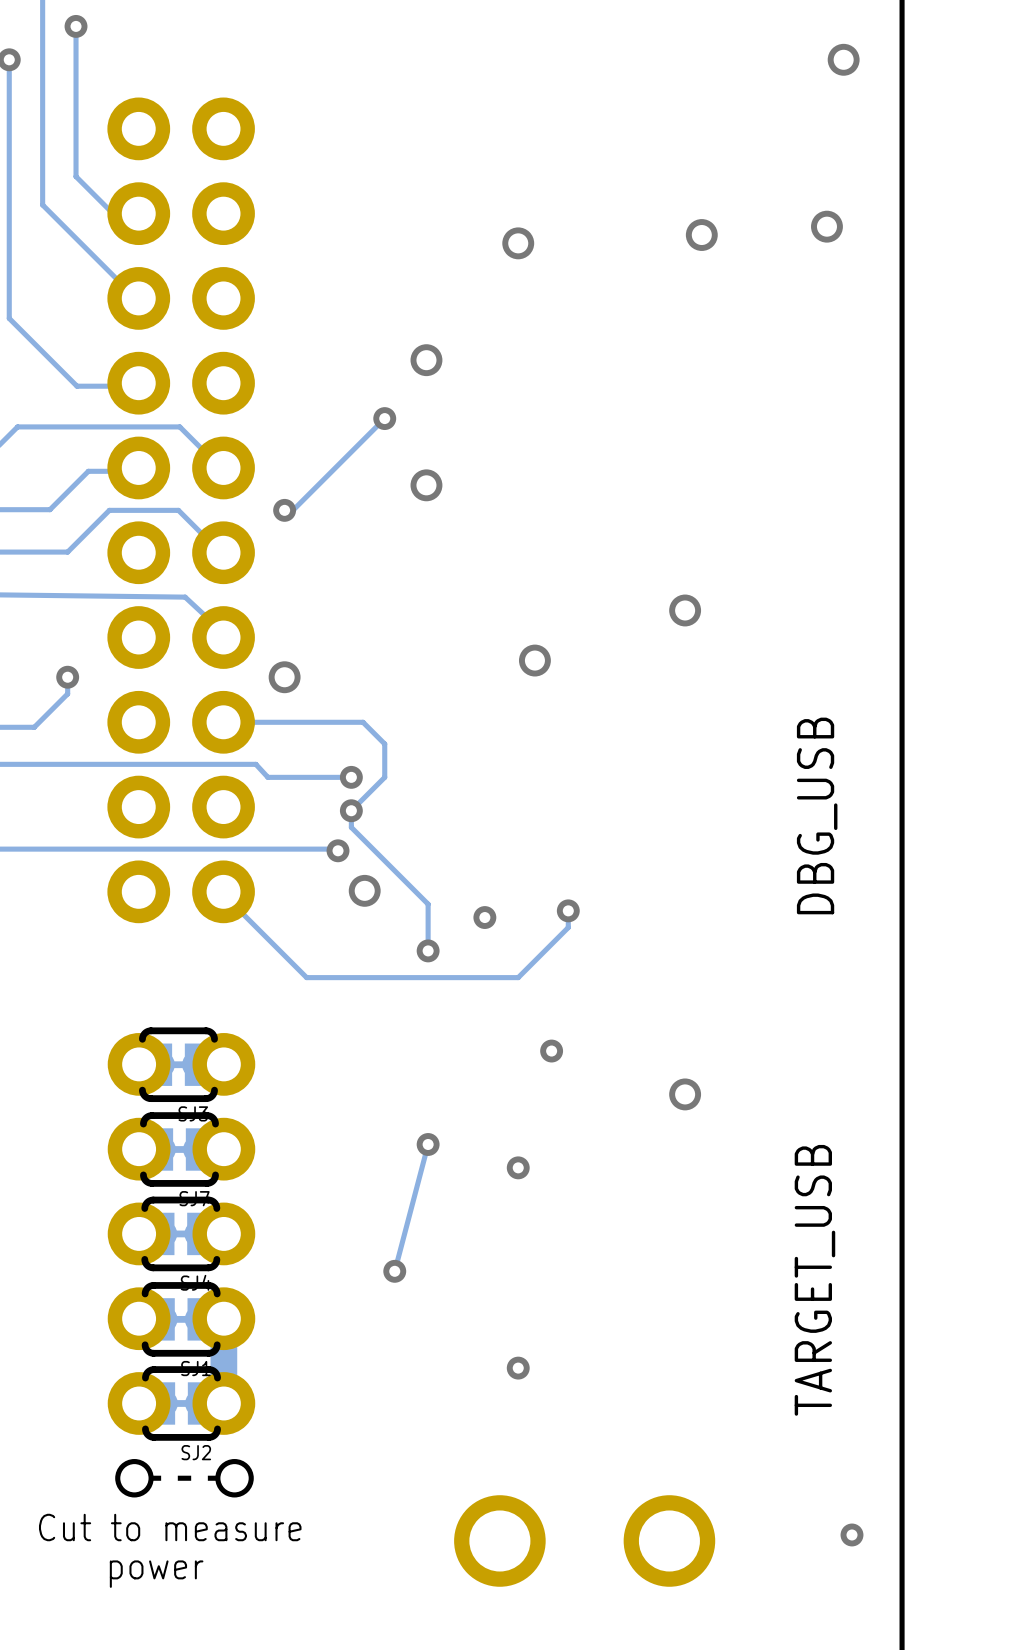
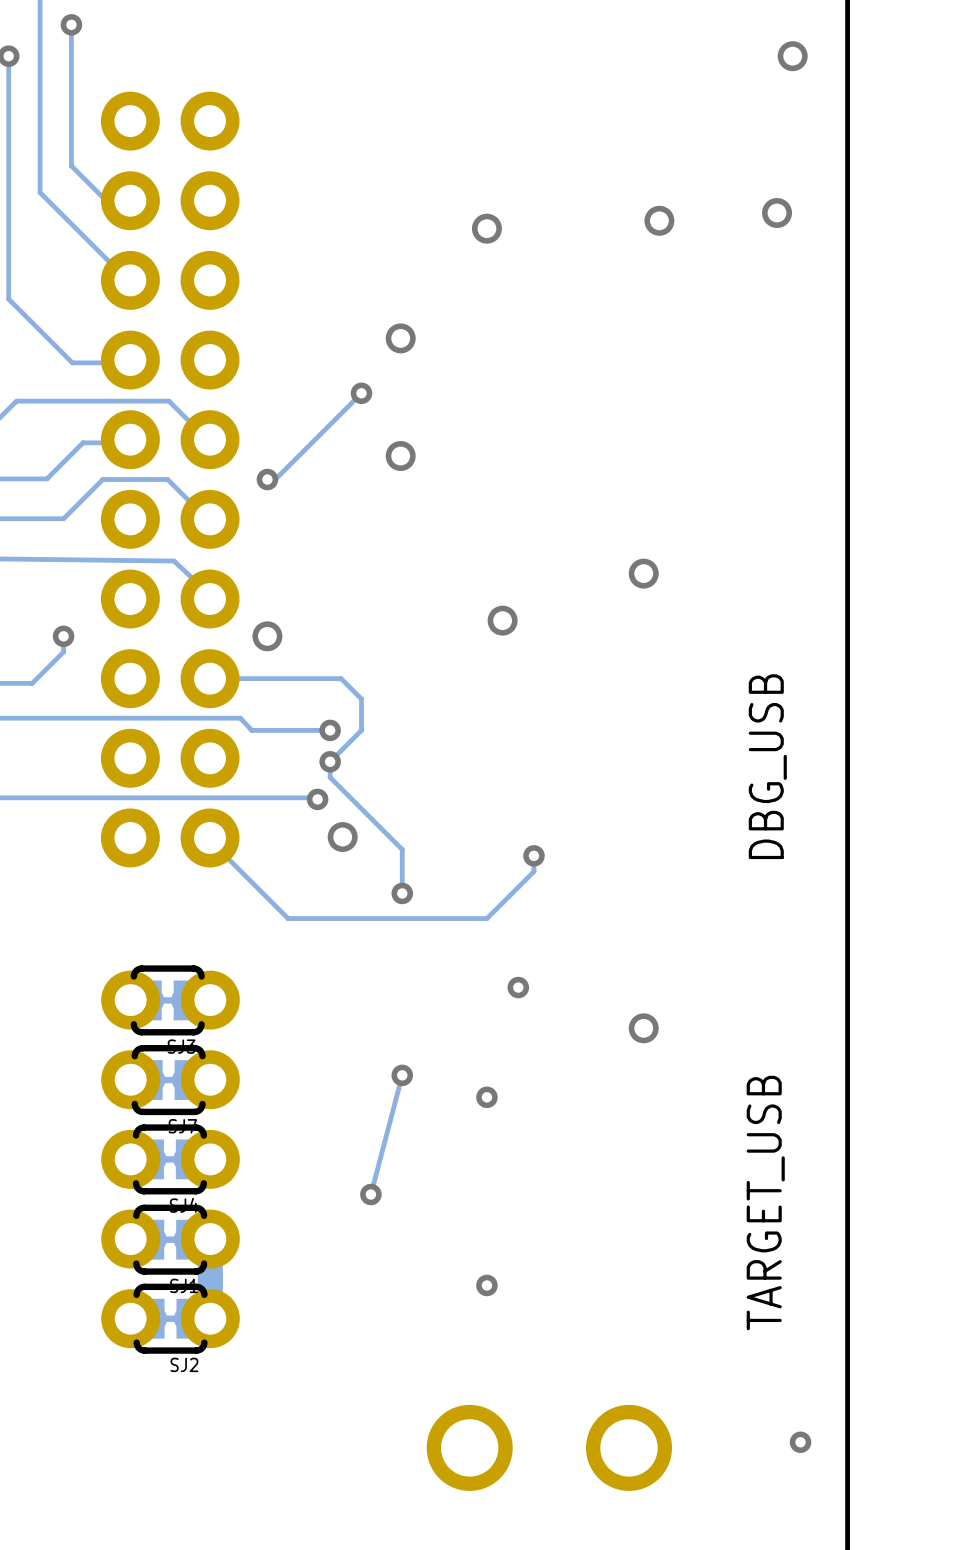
via: (484, 917) -> none
drawing: [115, 1459, 154, 1498] -> none
drawing: [215, 1459, 254, 1498] -> none
line: (161, 1478) (151, 1478) -> none
line: (191, 1478) (177, 1478) -> none
line: (217, 1478) (207, 1478) -> none
text: Cut to measure (170, 1527) -> none
text: power (156, 1574) -> none

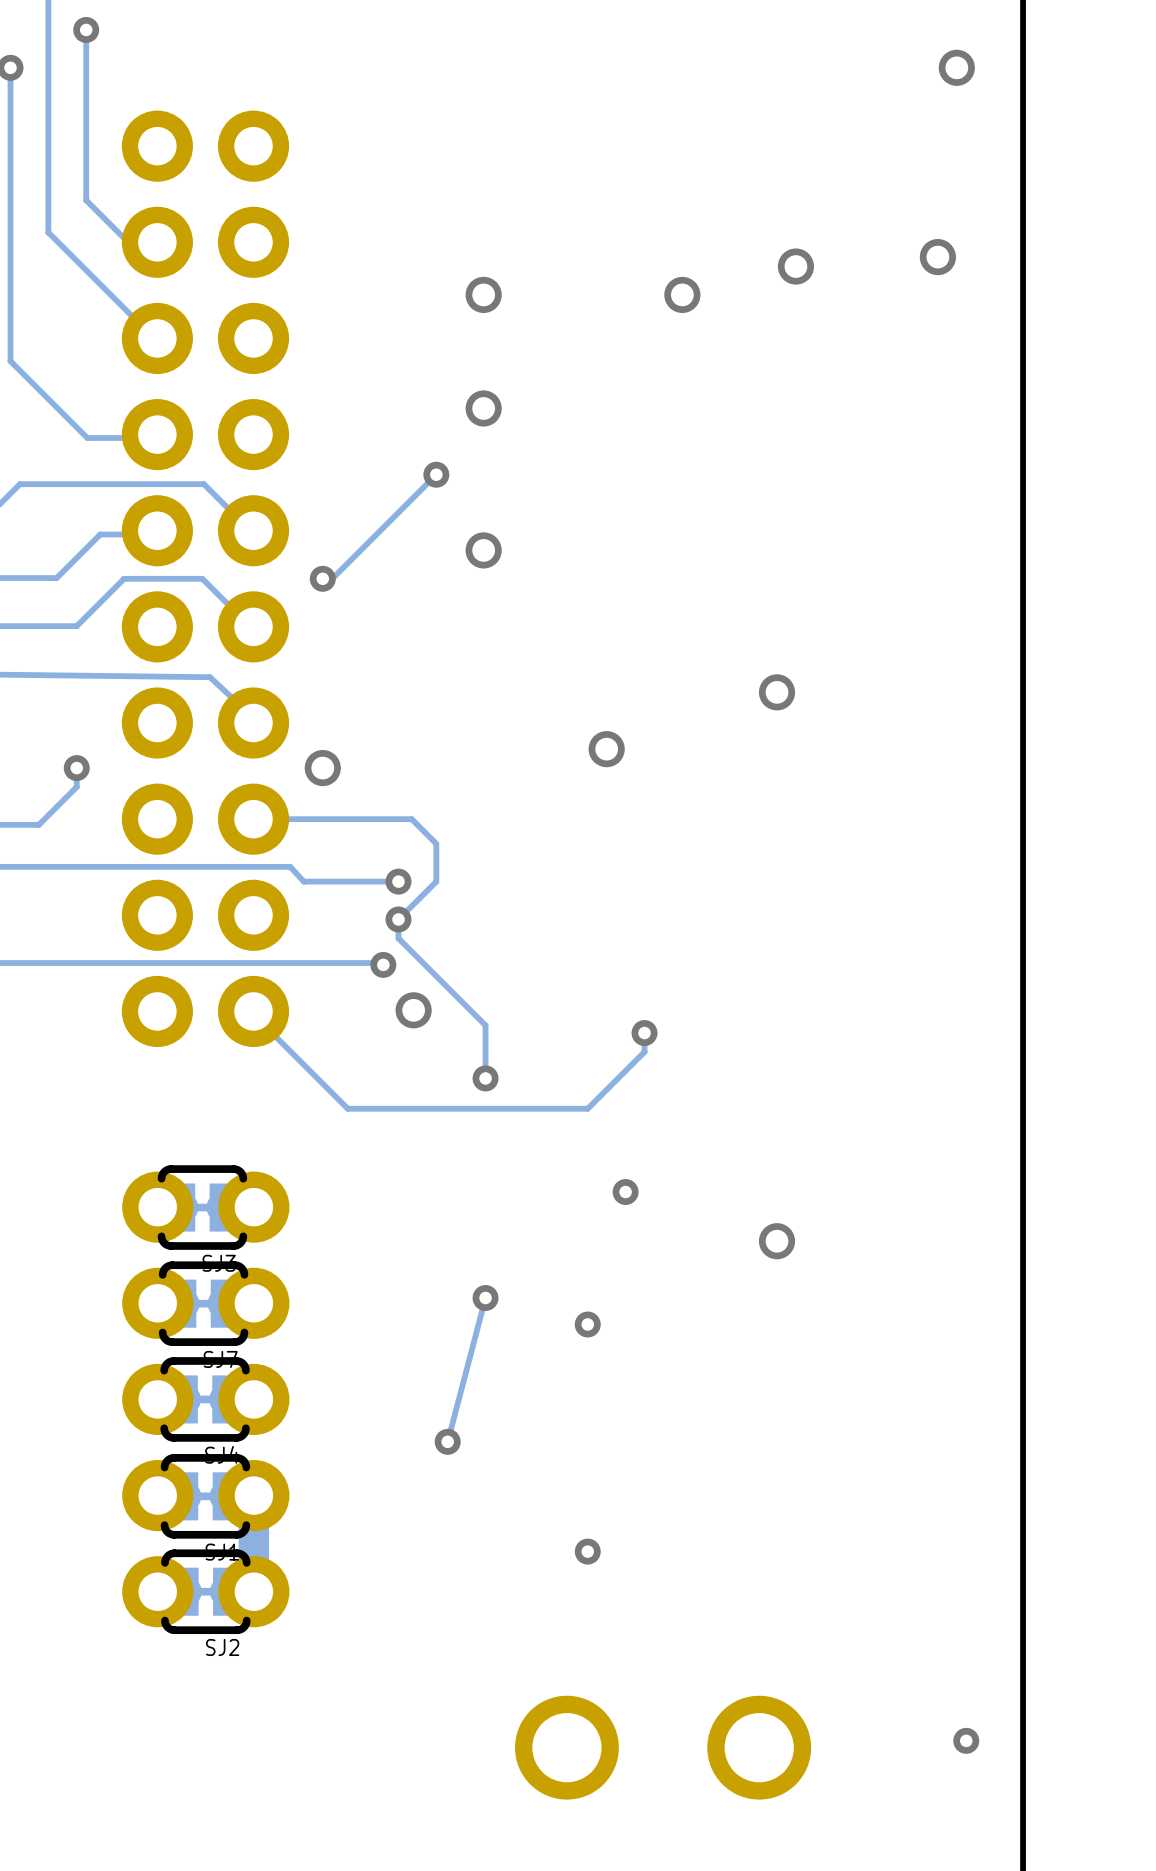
via: (486, 228) -> none
via: none -> (483, 294)
via: none -> (682, 294)
text: DBG_USB (767, 766) -> none
text: TARGET_USB (765, 1203) -> none

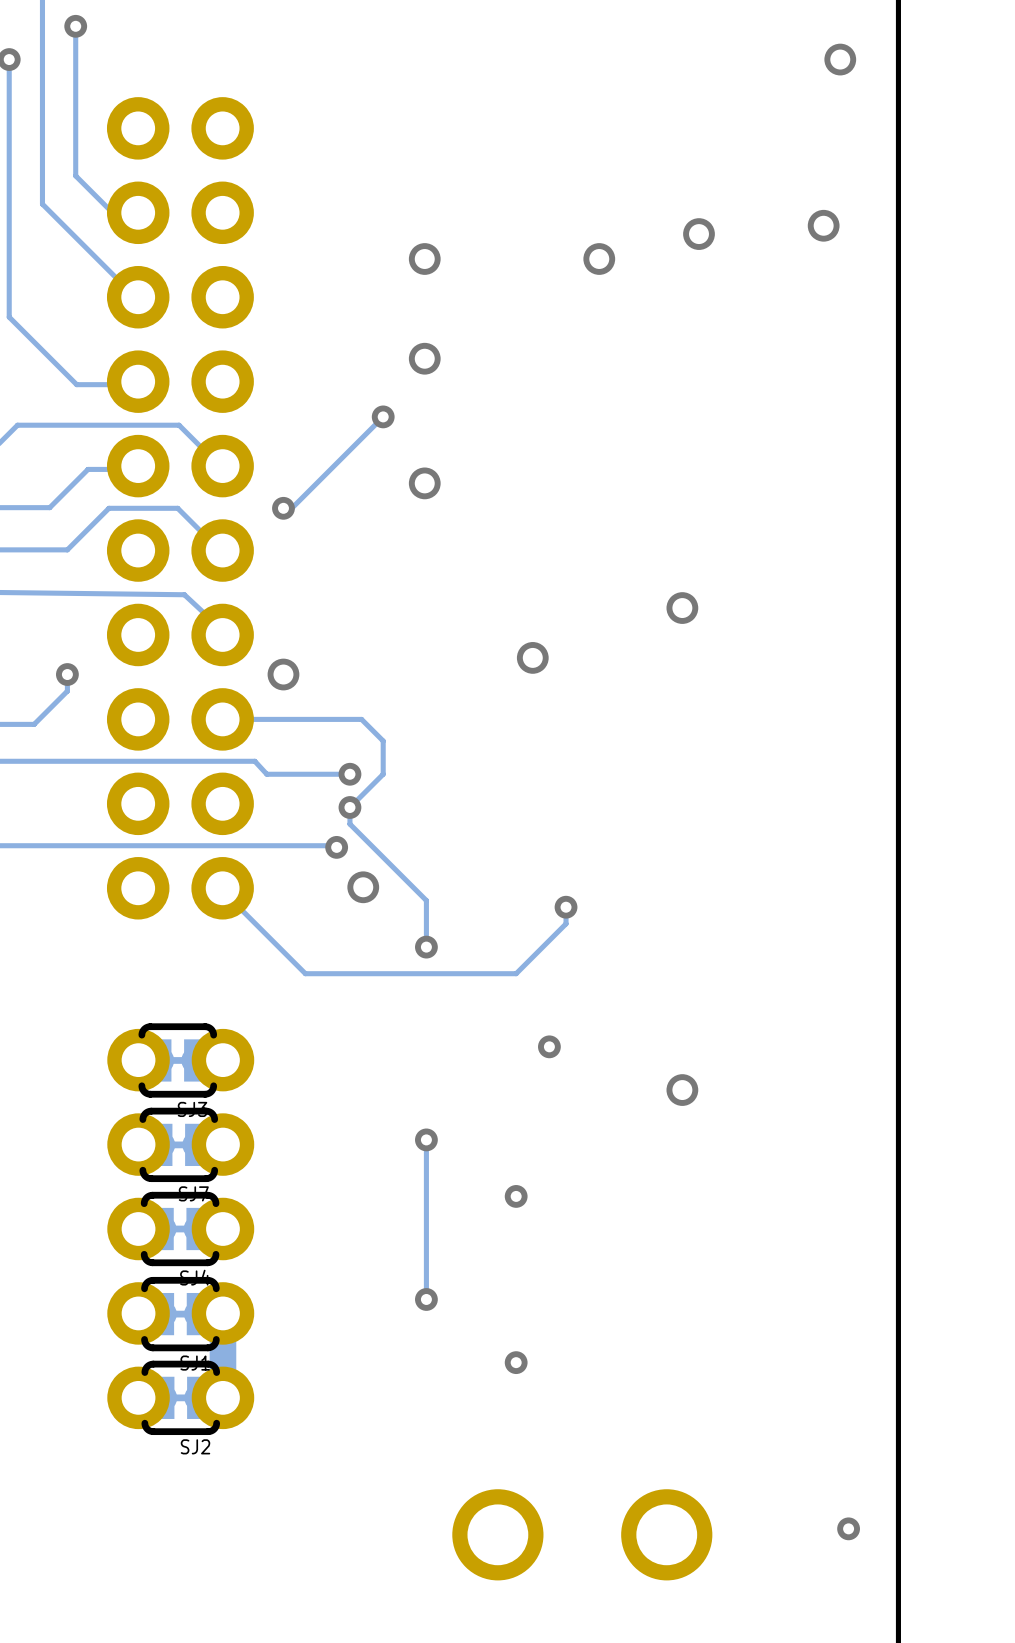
track: (485, 1297) (447, 1441) -> (426, 1139) (426, 1299)
via position: (587, 1324) -> (516, 1196)
via position: (447, 1441) -> (426, 1299)

